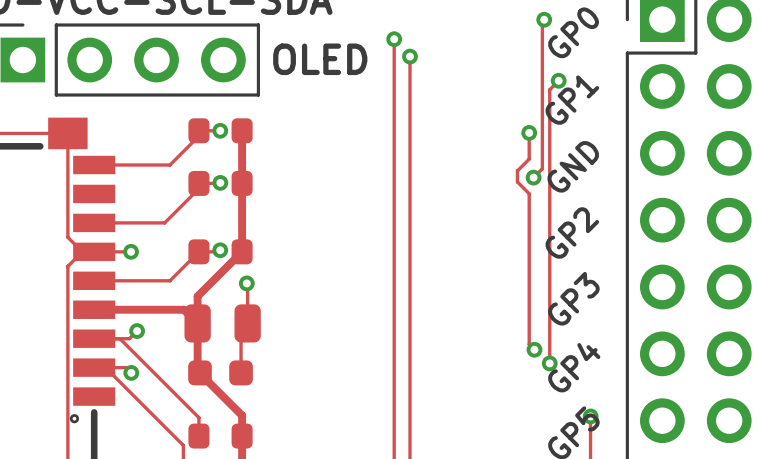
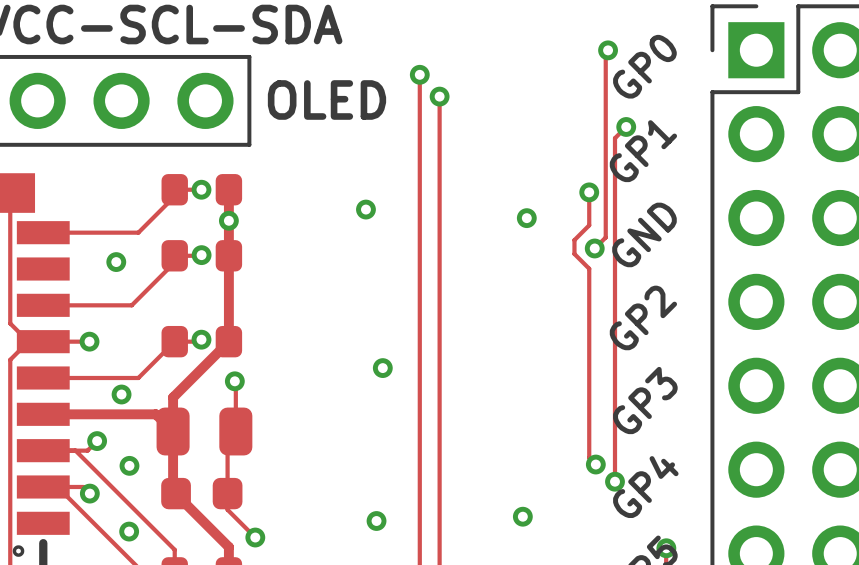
via: none -> (365, 209)
via: none -> (526, 218)
via: none -> (228, 220)
via: none -> (116, 262)
via: none -> (382, 368)
via: none -> (121, 394)
via: none -> (129, 465)
track: none -> (227, 493) (227, 509) (255, 537)
via: none -> (522, 516)
via: none -> (376, 521)
via: none -> (129, 531)
via: none -> (255, 537)

